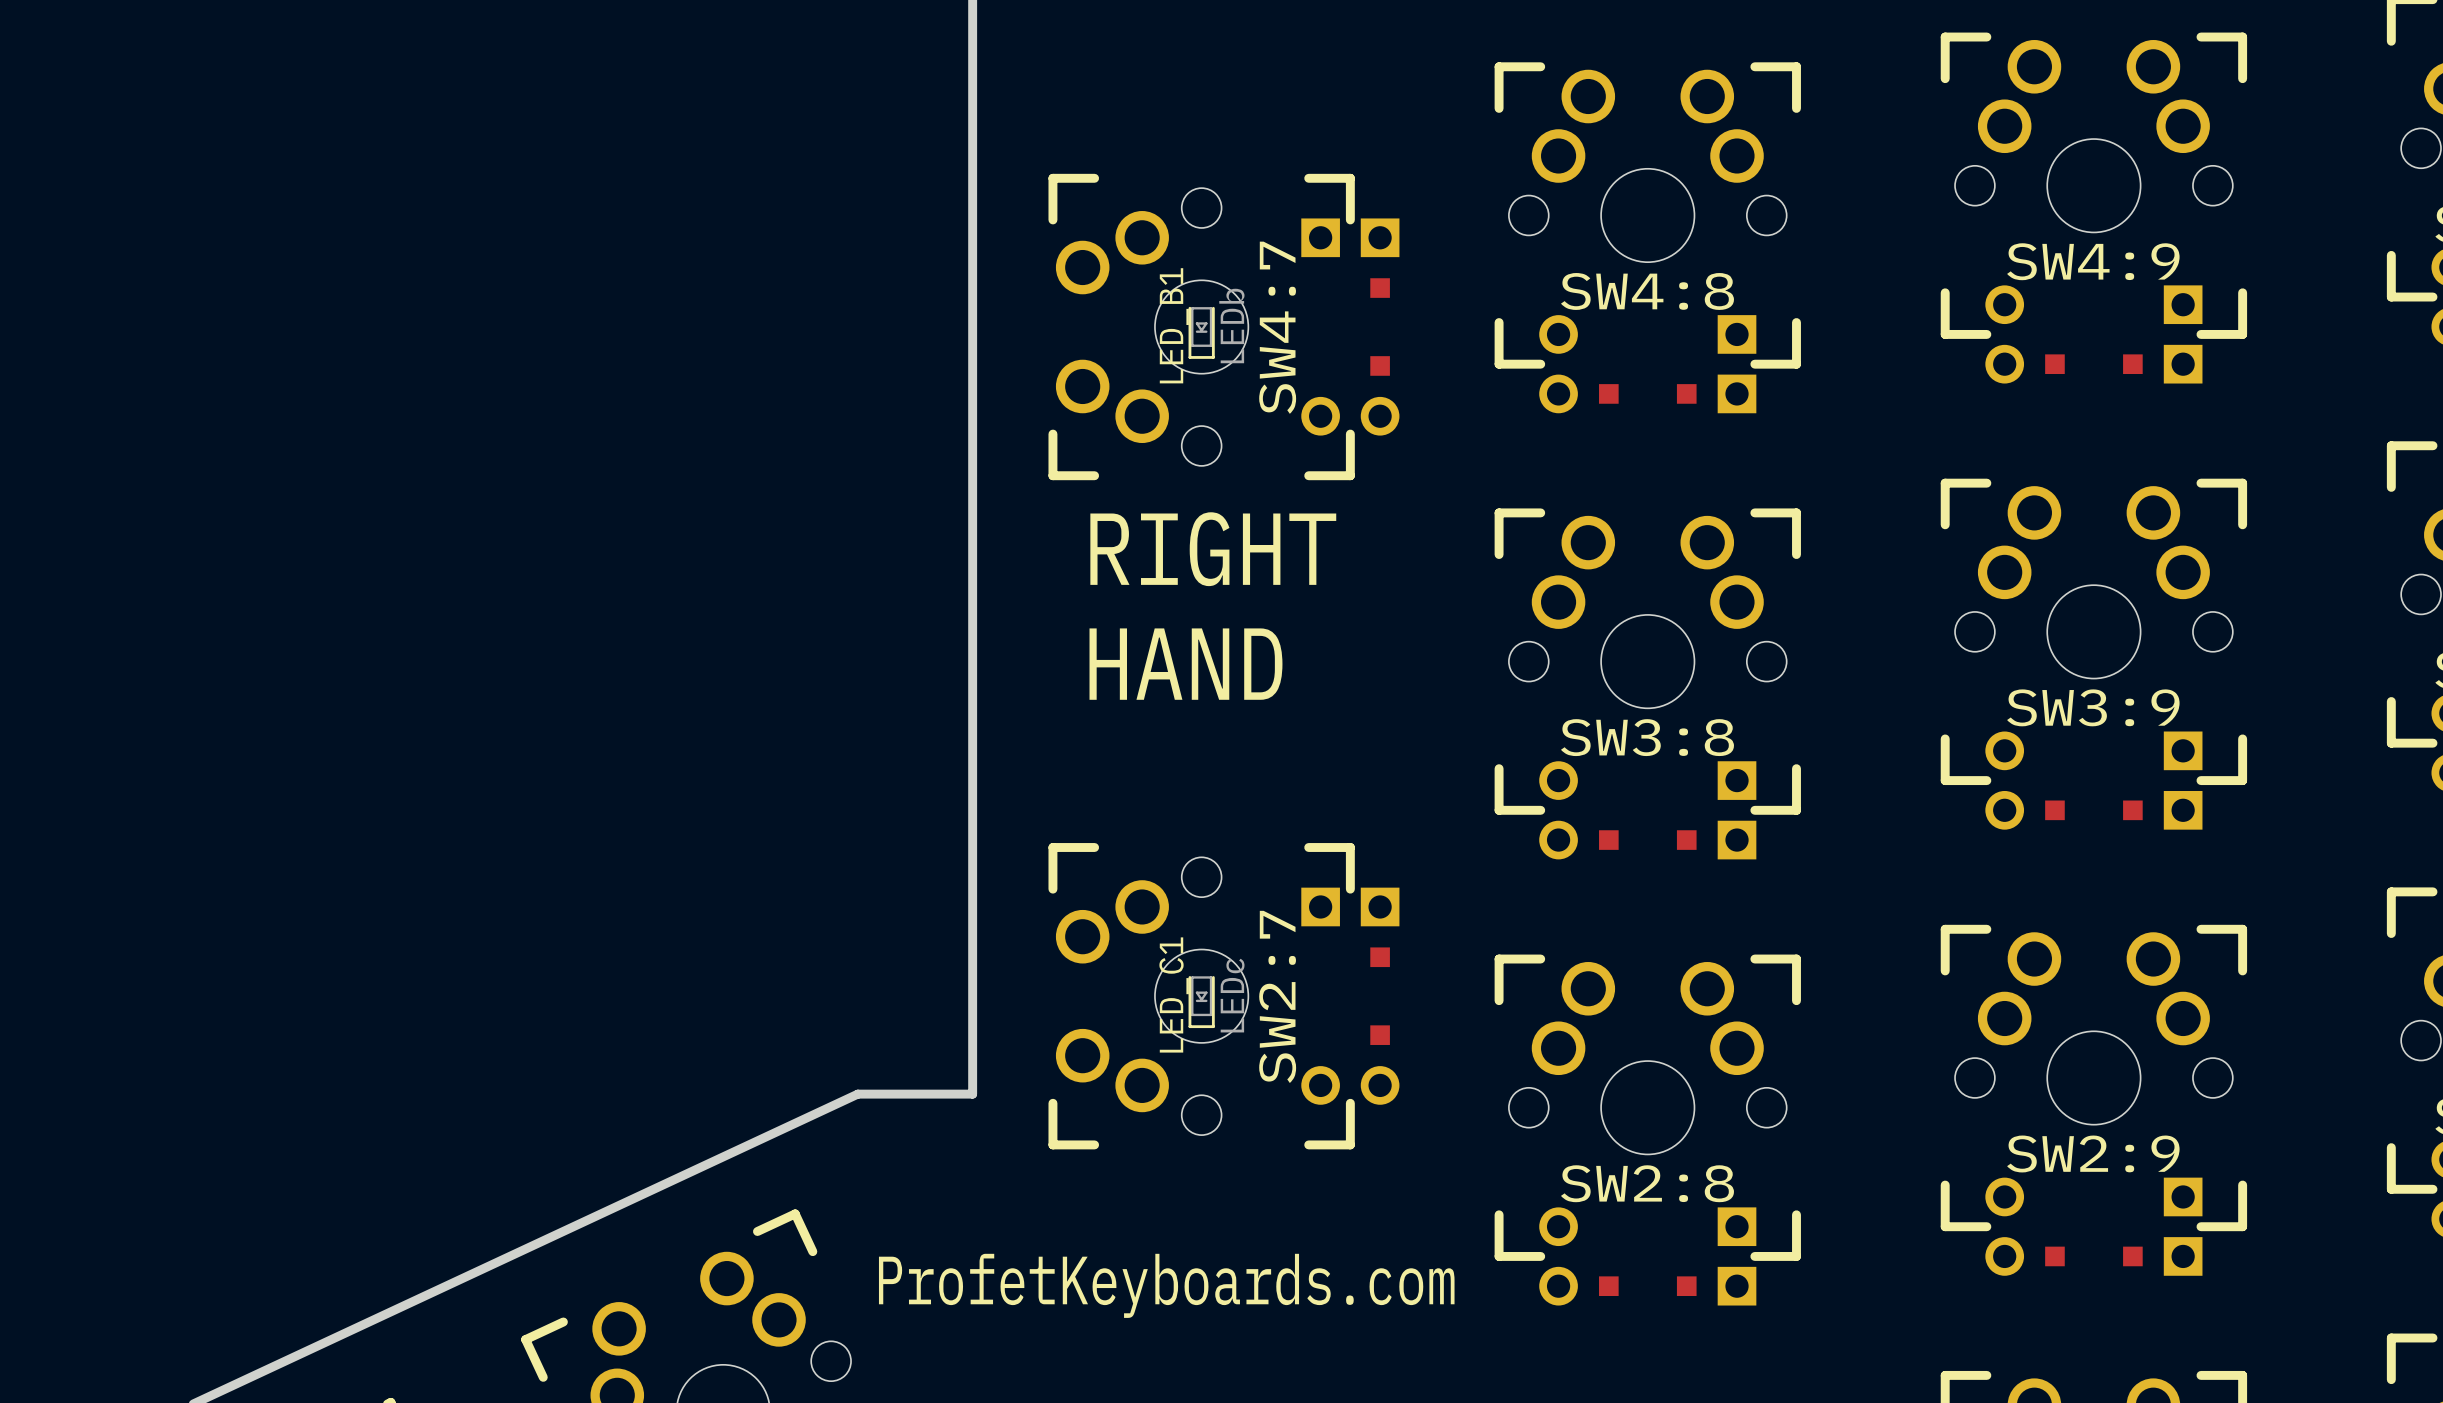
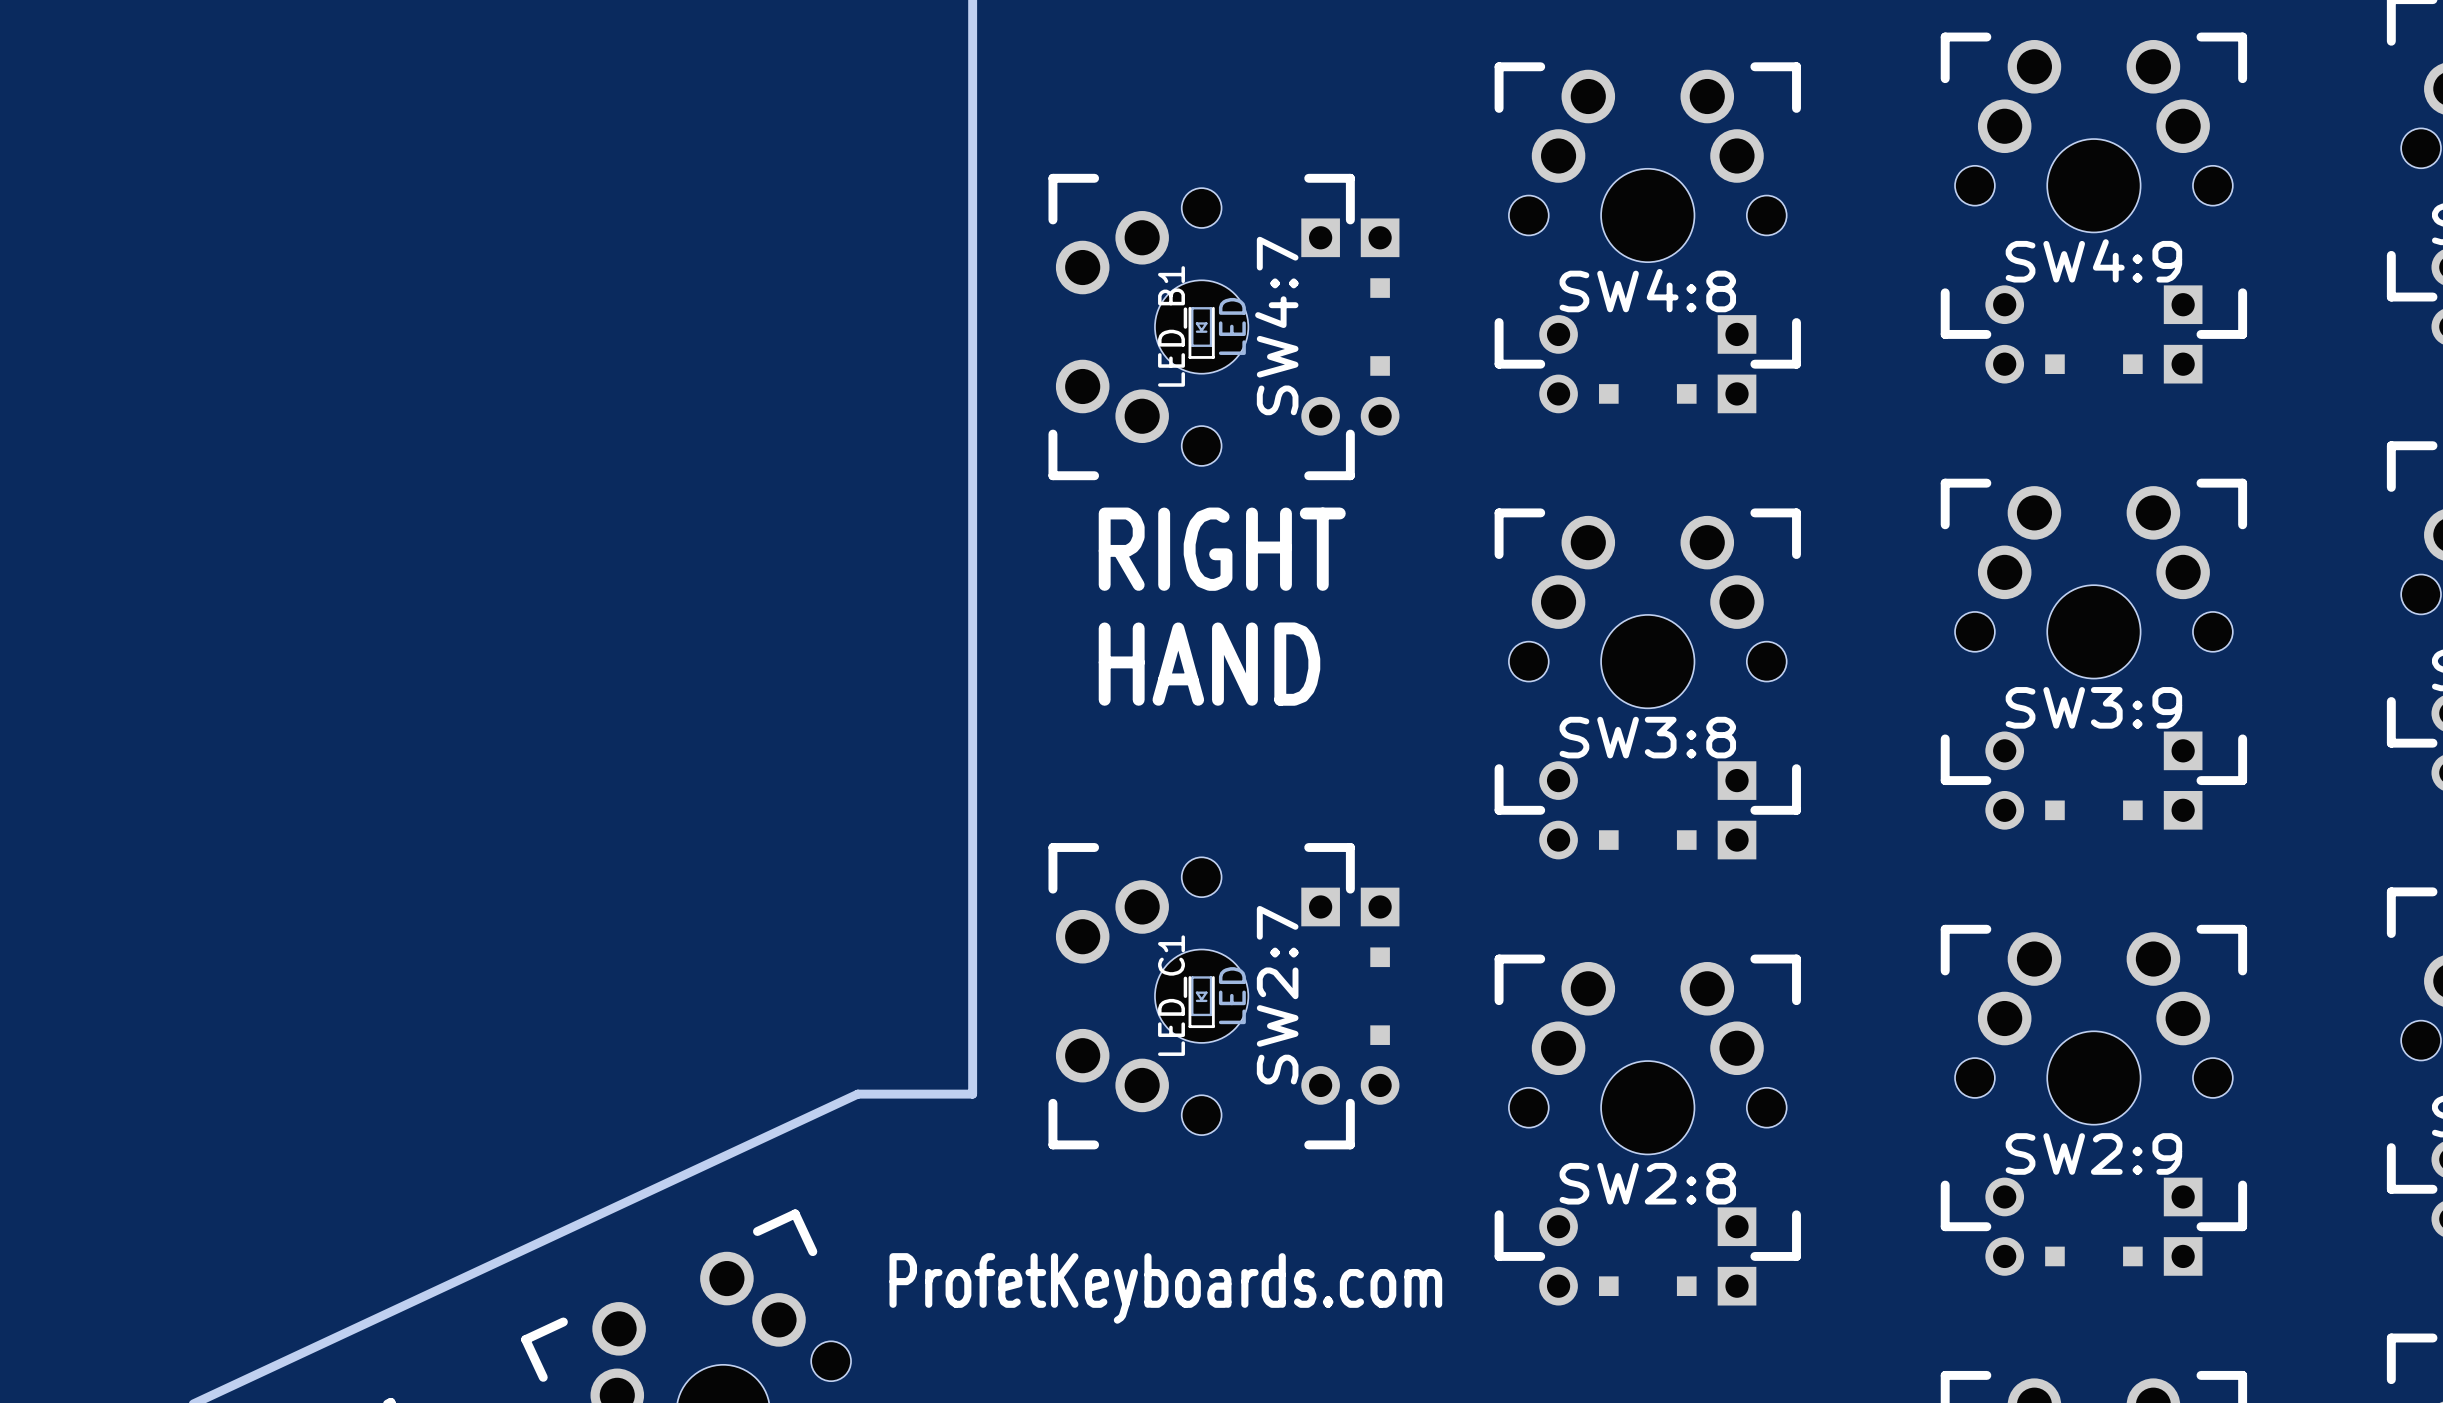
LED_B1 value: LEDb (1231, 326) -> LED (1232, 326)
LED_C1 value: LEDc (1232, 995) -> LED (1232, 995)

